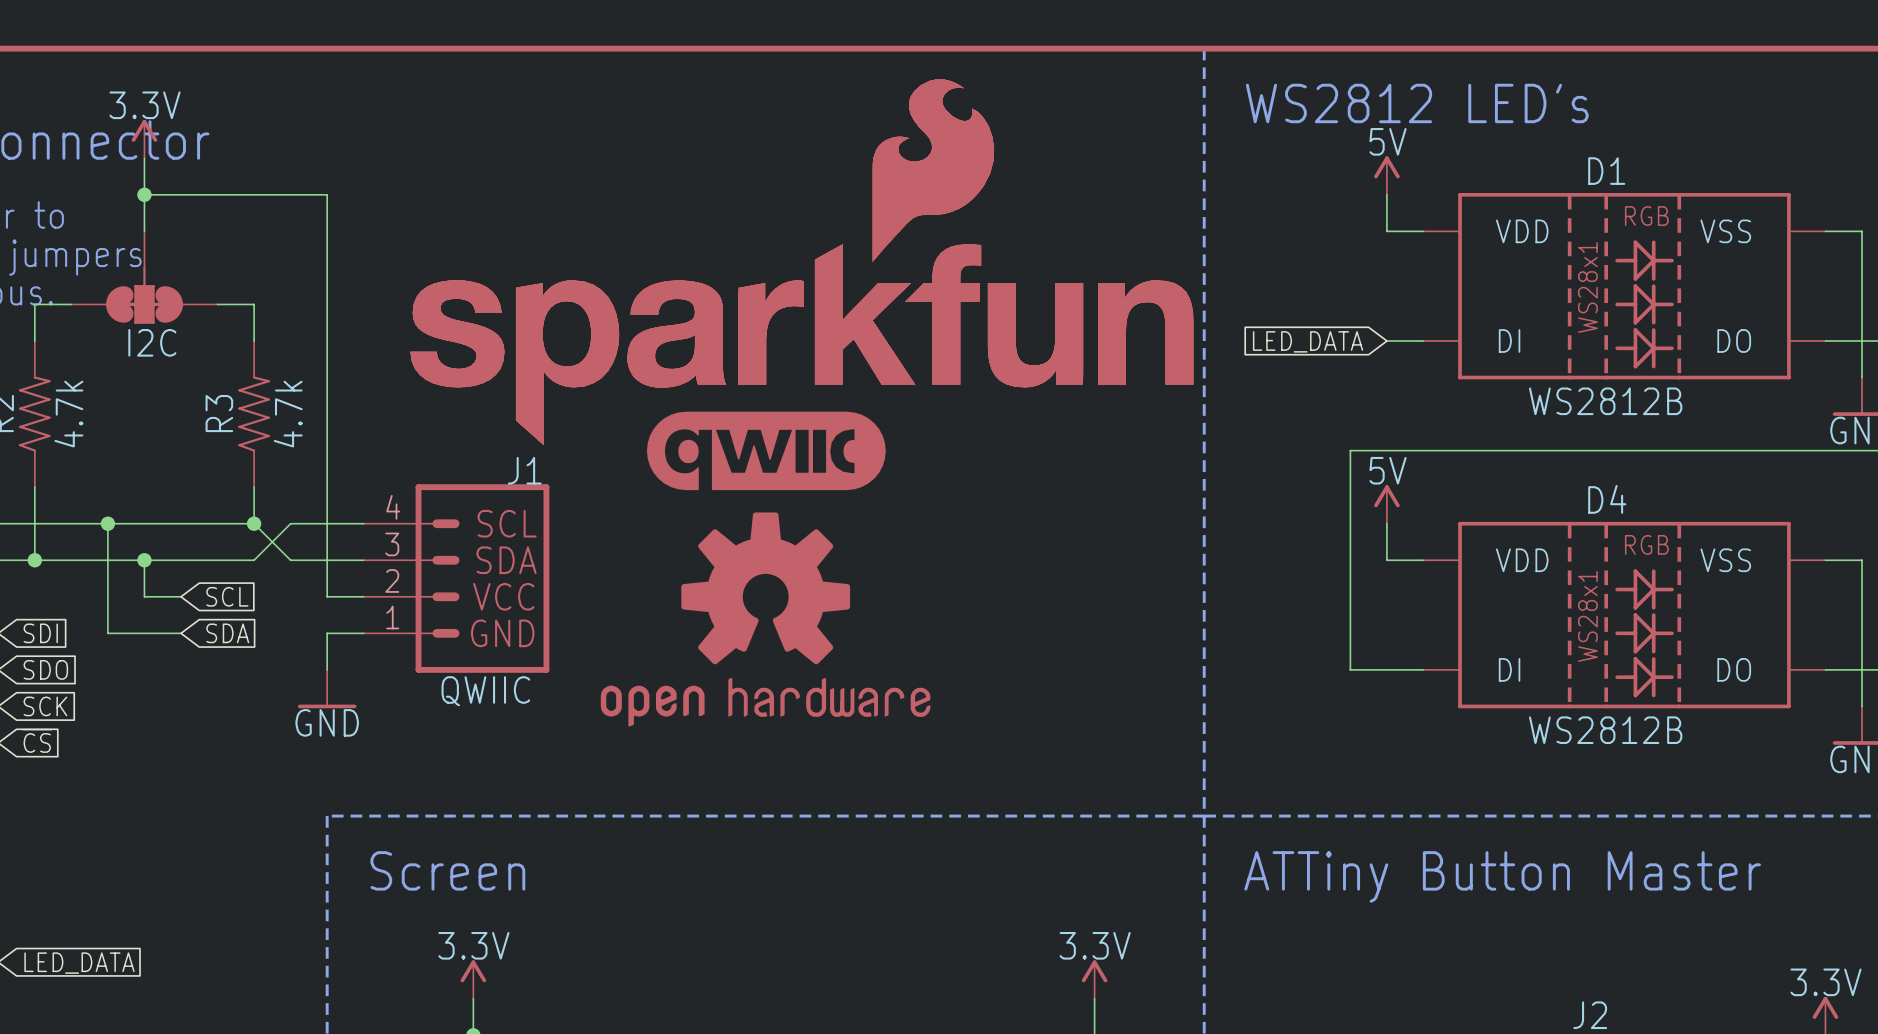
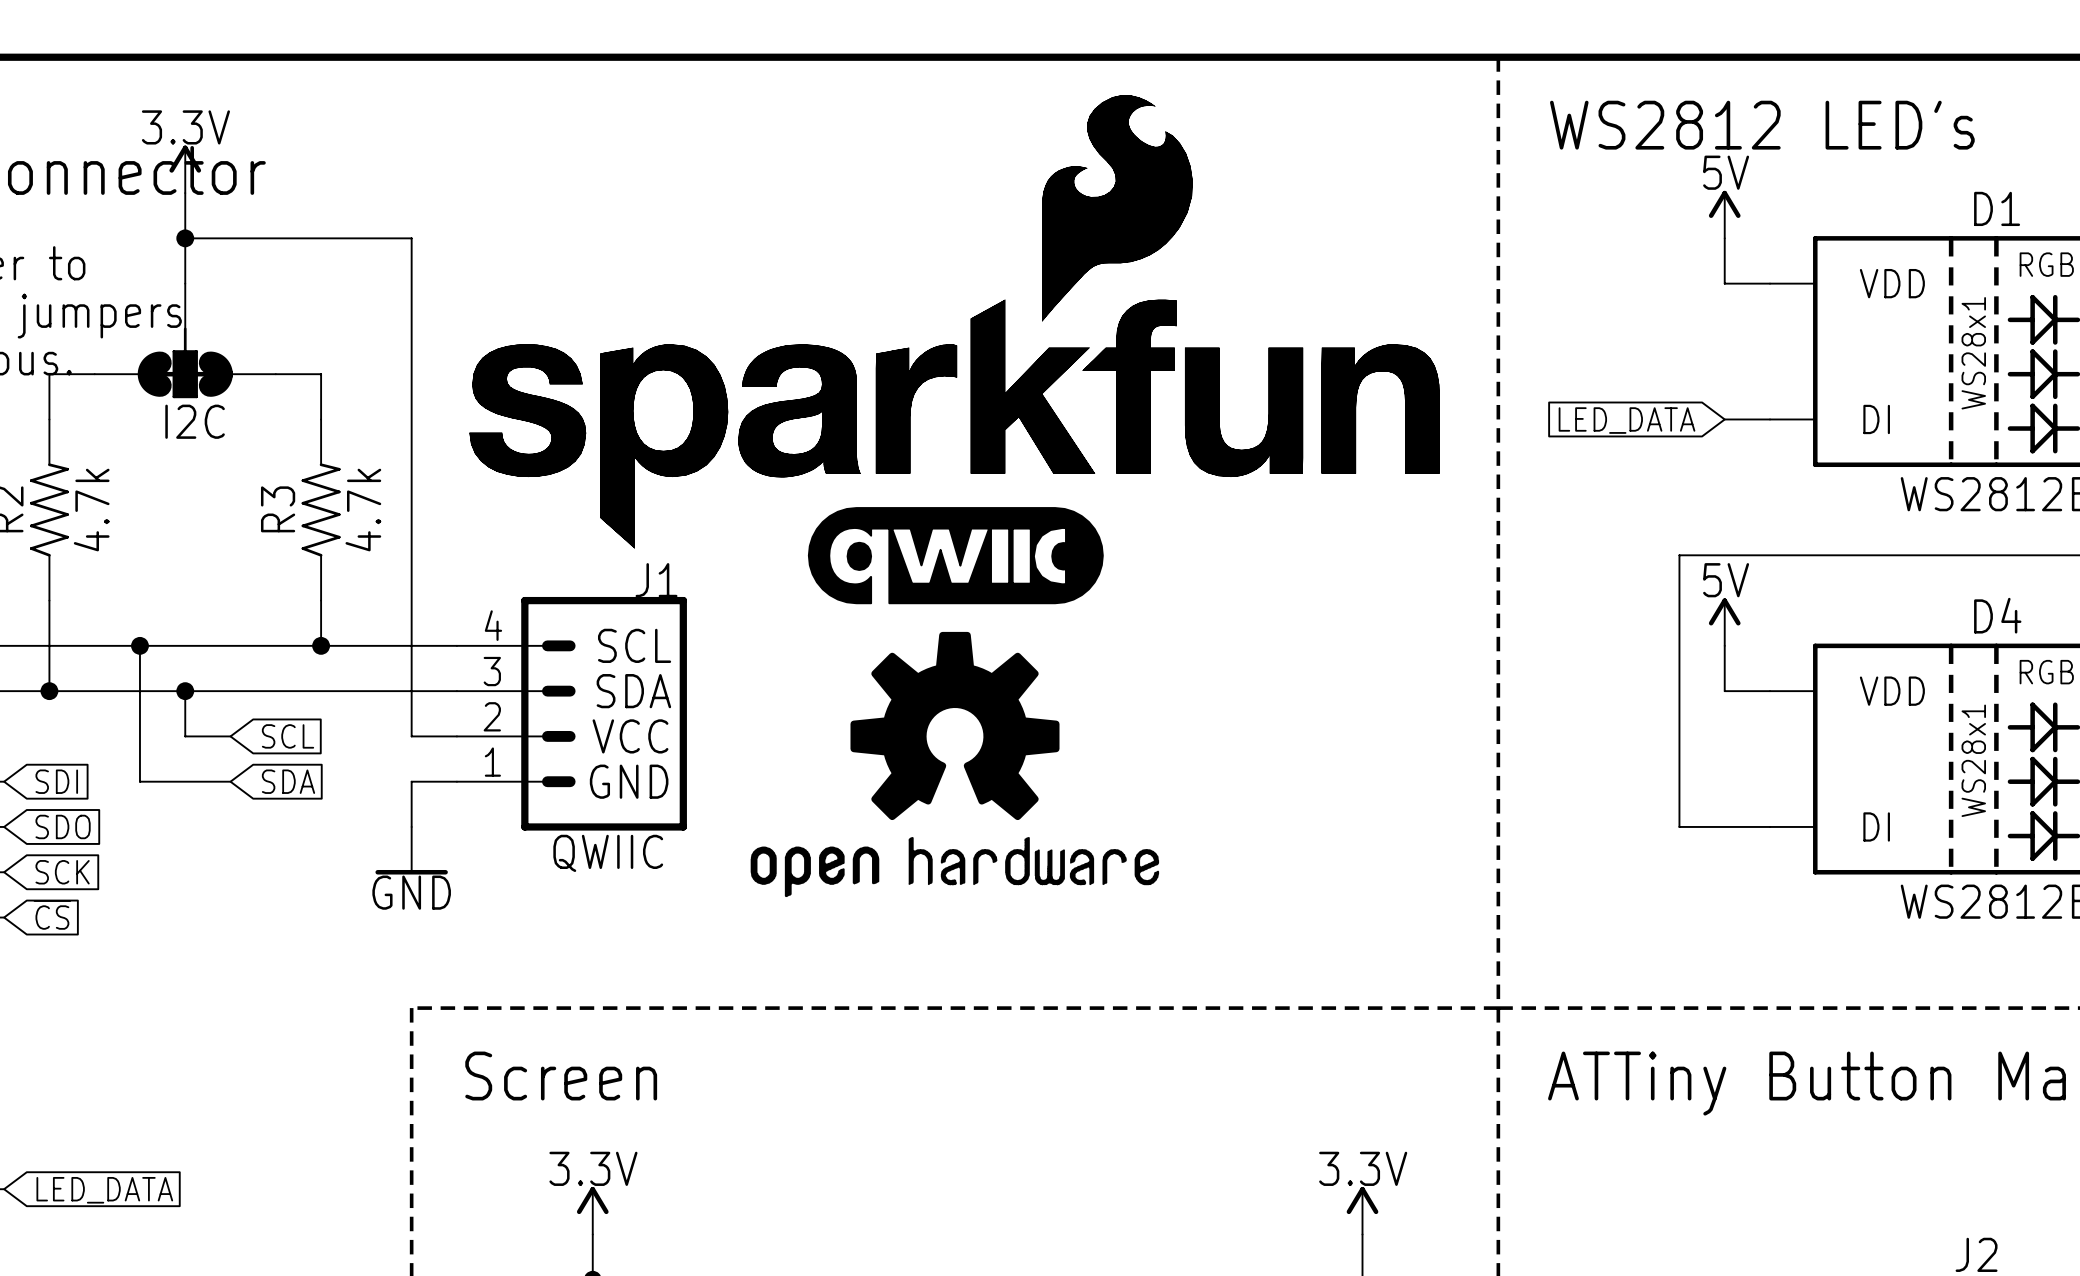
part position: (801, 262) -> (954, 321)
wire: (254, 523) (290, 560) -> (321, 645) (366, 645)
wire: (290, 523) (254, 560) -> (366, 691) (321, 691)

